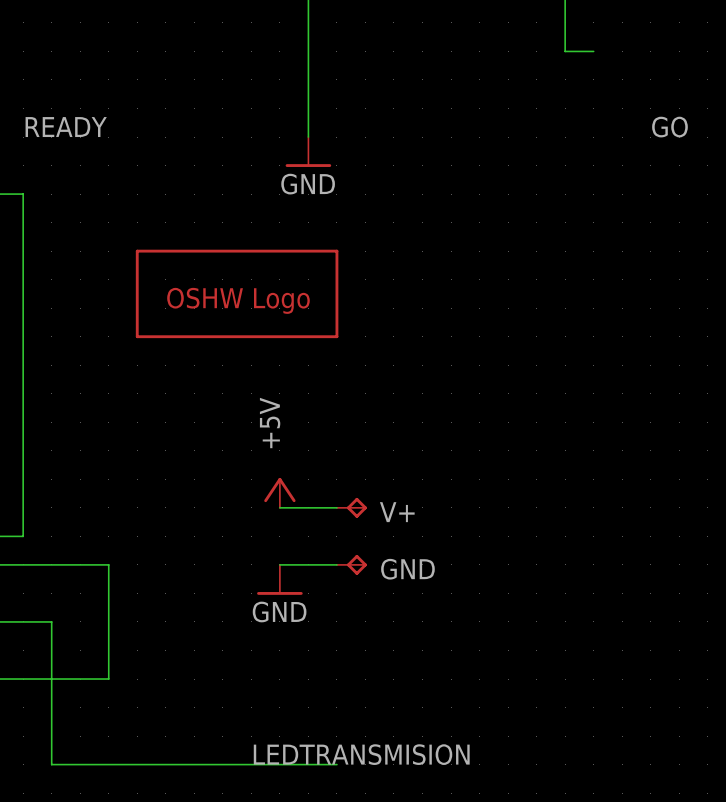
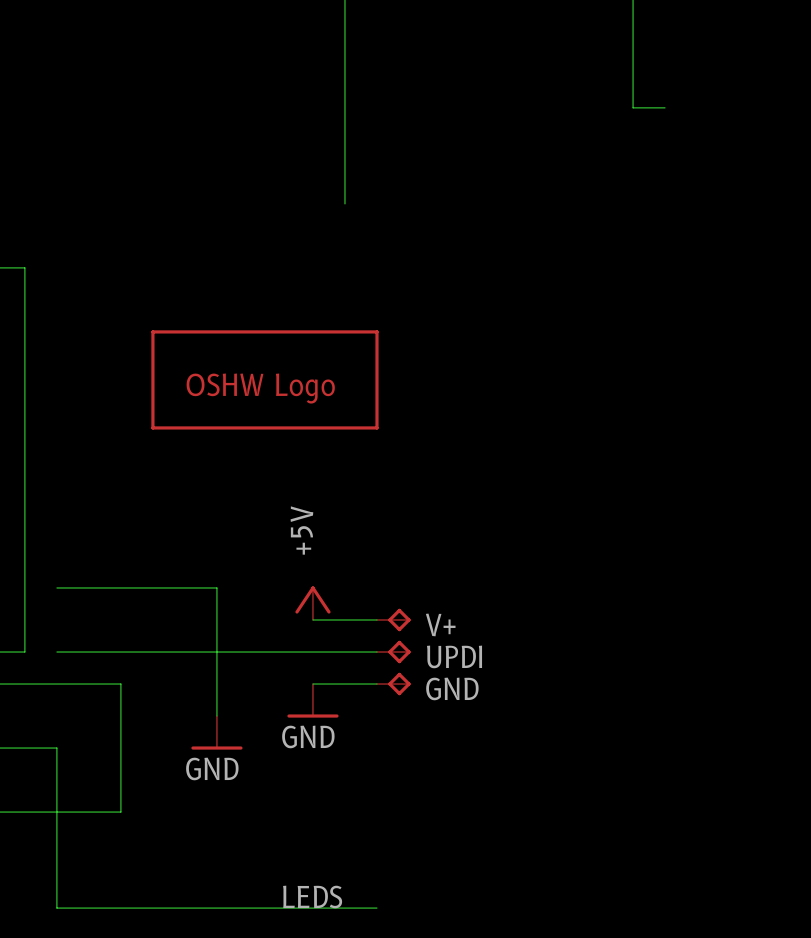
label: READY (66, 127) -> none
label: GO (669, 127) -> none
power symbol: GND (308, 152) -> none
wire: none -> (56, 587) (216, 587) (216, 716)
wire: none -> (56, 652) (376, 652)
UPDI: none -> (393, 652)
power symbol: none -> GND (216, 732)
label: LEDTRANSMISION (361, 754) -> LEDS (312, 896)

